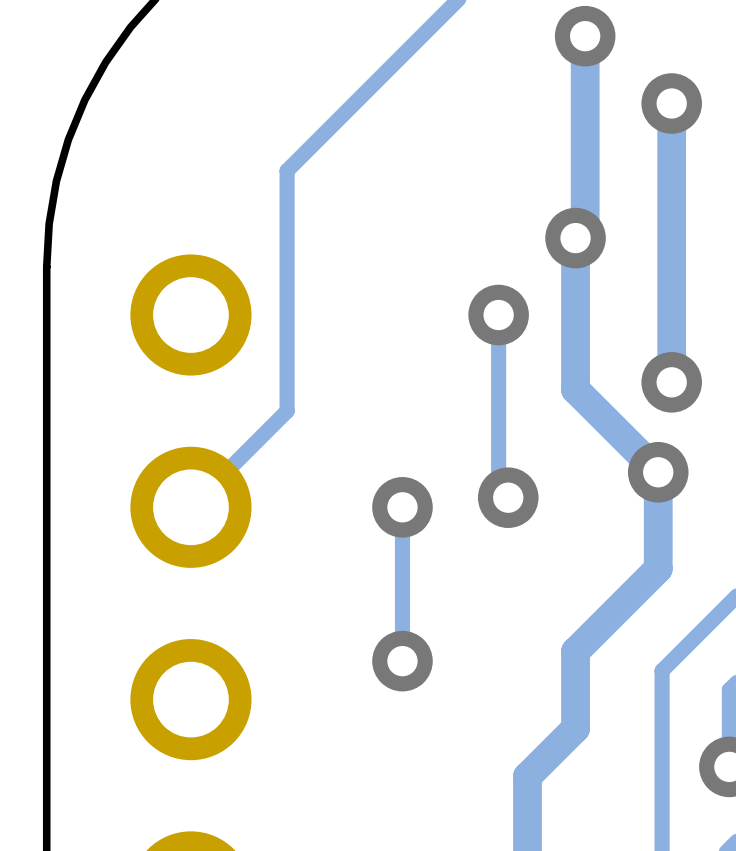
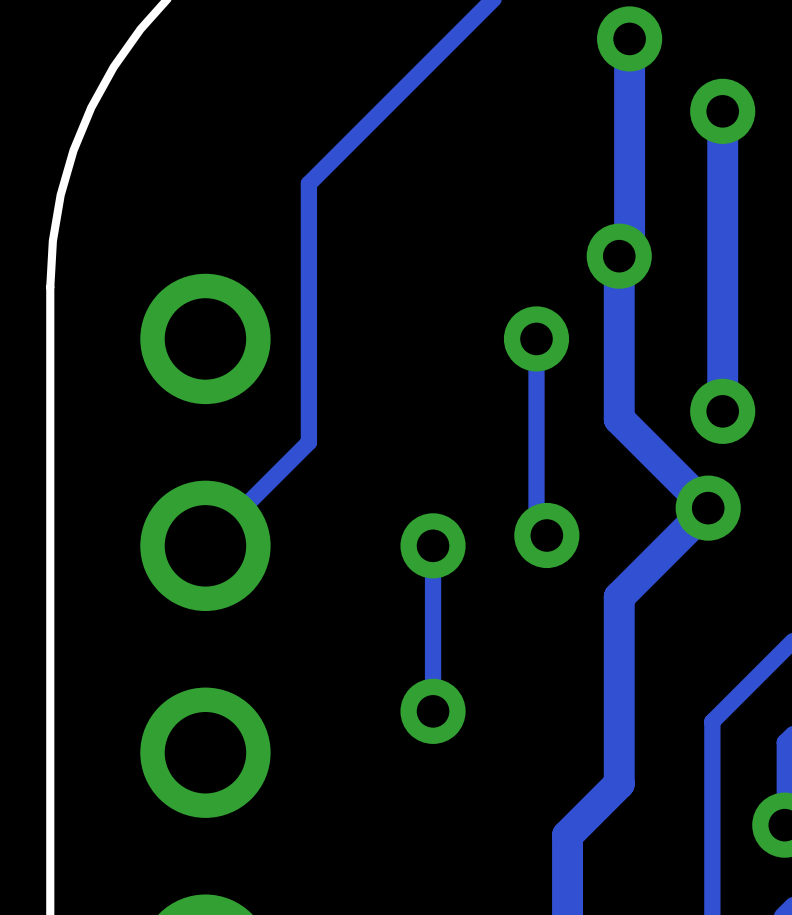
track: (658, 472) (658, 568) (575, 651) -> (708, 508) (619, 597) (619, 701)

